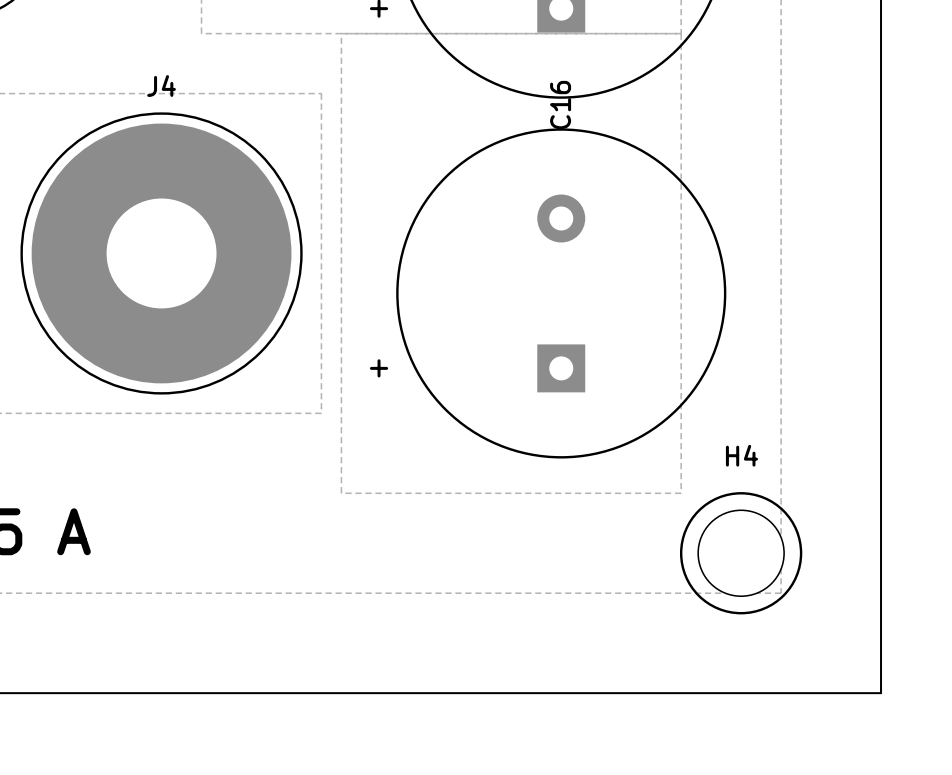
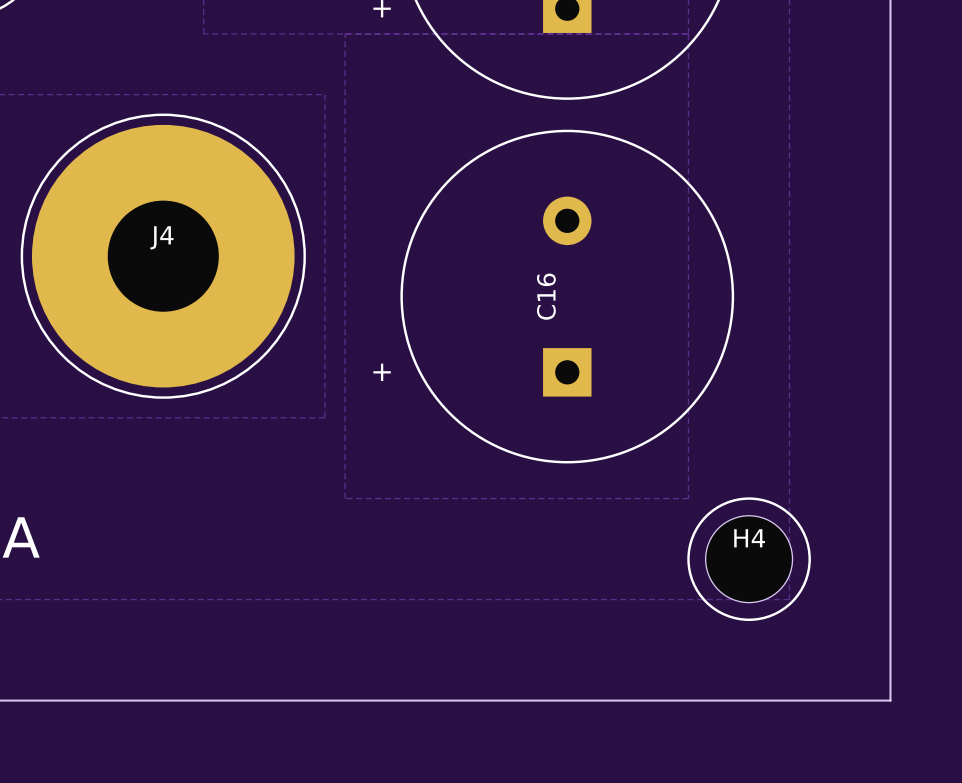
J4 name position: J4 (161, 85) -> J4 (161, 237)
C16 name position: C16 (560, 105) -> C16 (546, 296)
H4 name position: H4 (741, 455) -> H4 (749, 538)

